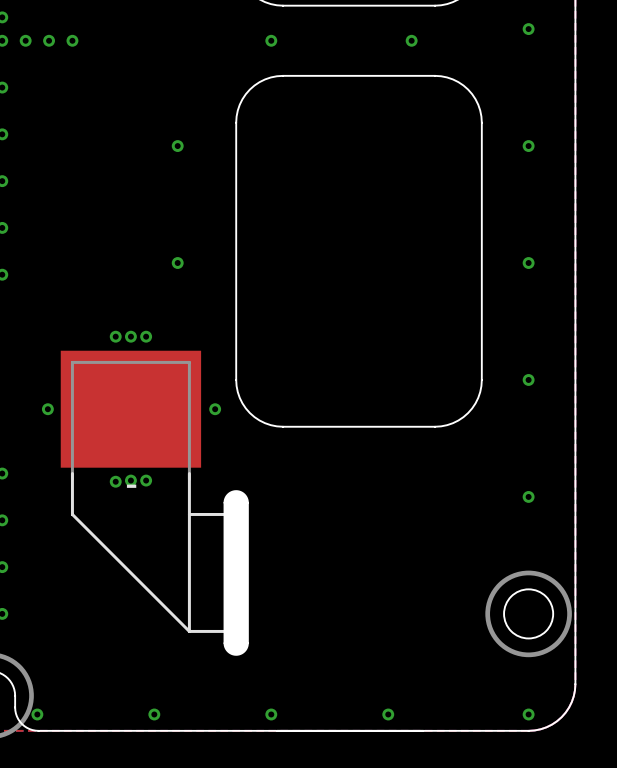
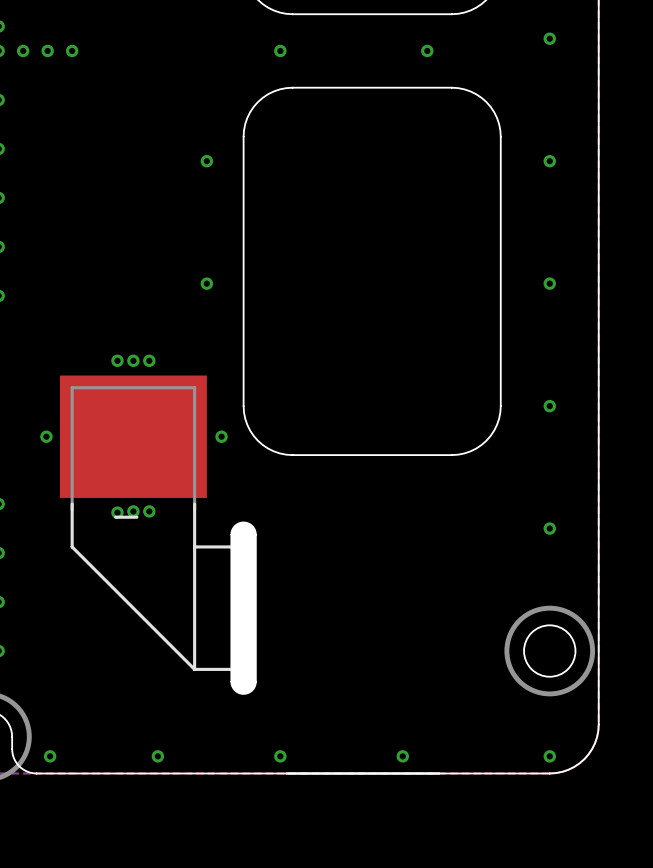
via position: (177, 146) -> (206, 161)
via position: (177, 263) -> (206, 283)
via position: (37, 714) -> (50, 756)

